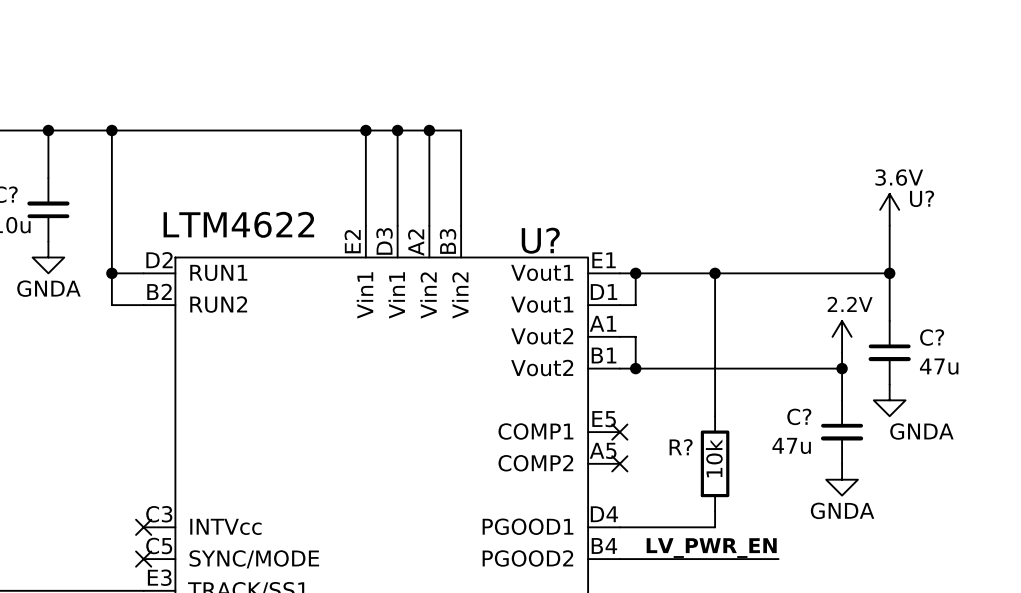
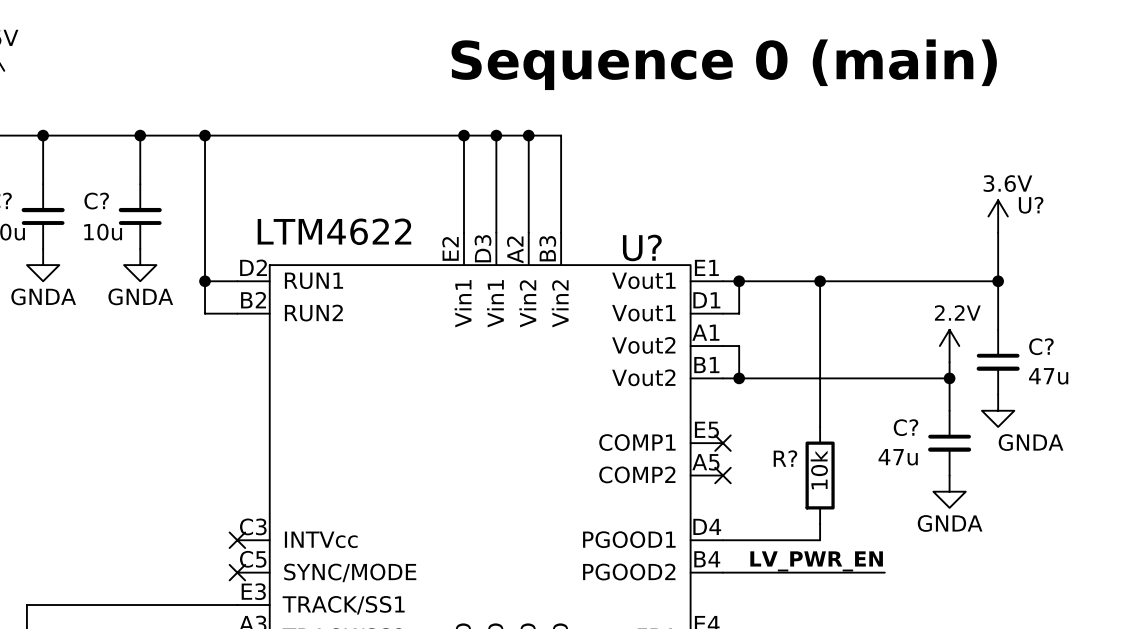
text: none -> Sequence 0 (main) (724, 64)

